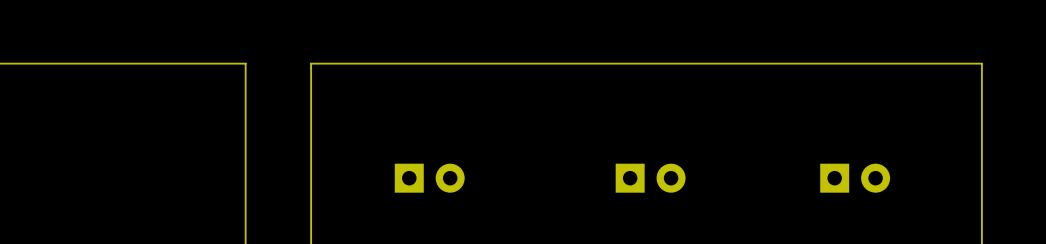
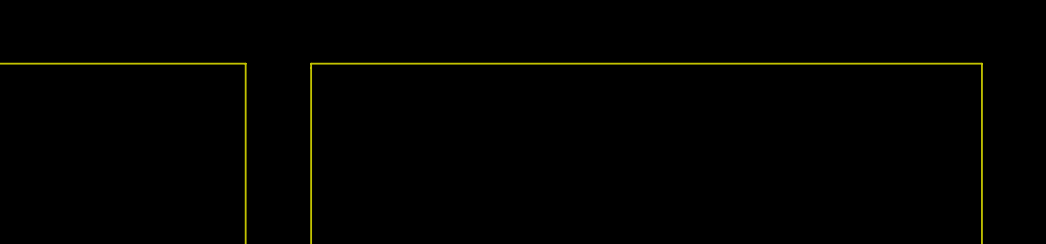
part: (429, 178) -> none
part: (650, 178) -> none
part: (855, 178) -> none

